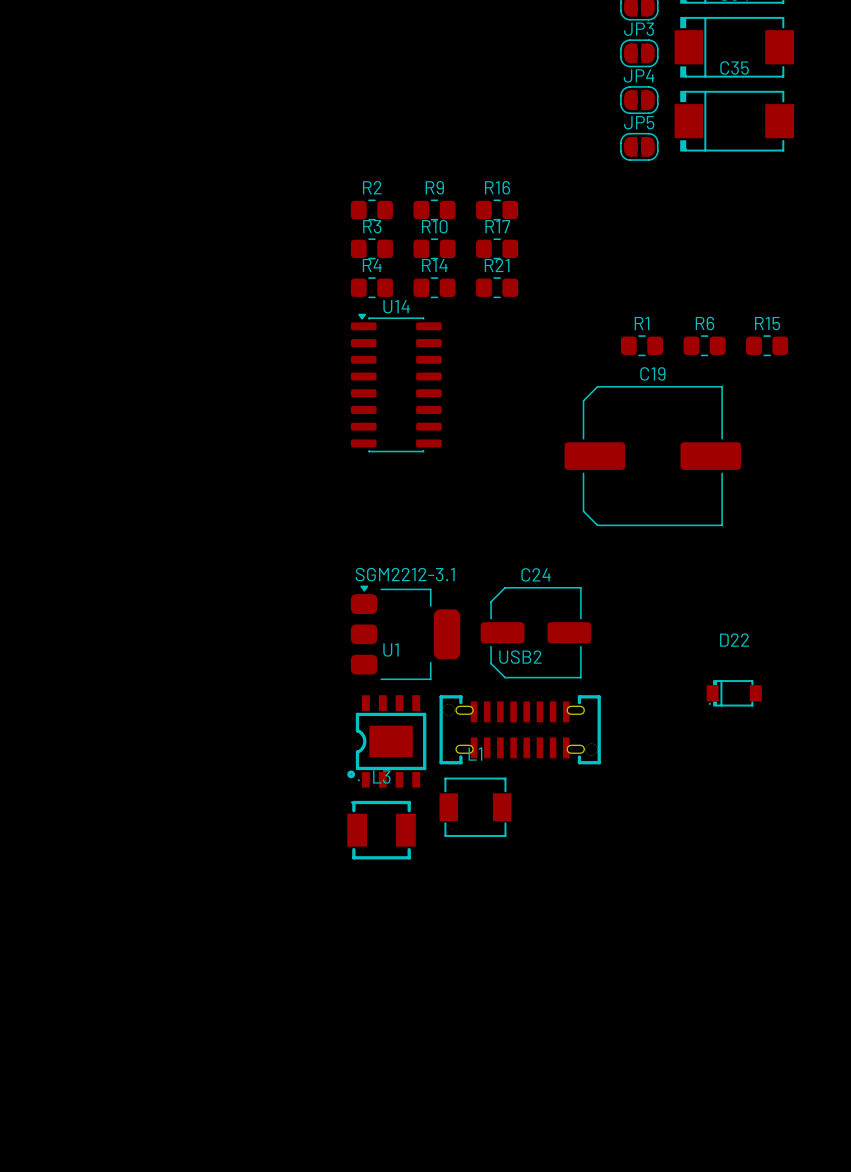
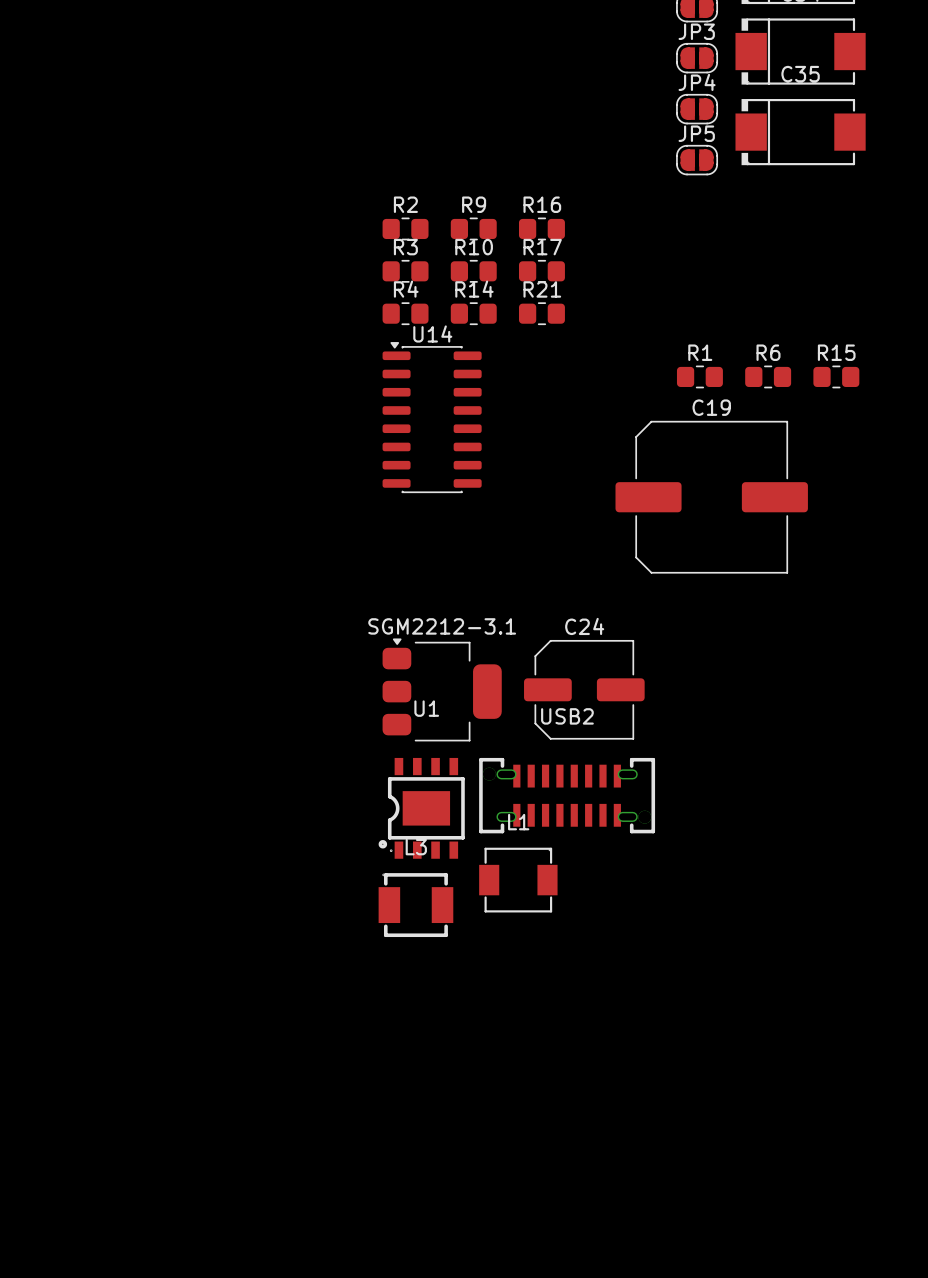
D22: (734, 693) -> none

